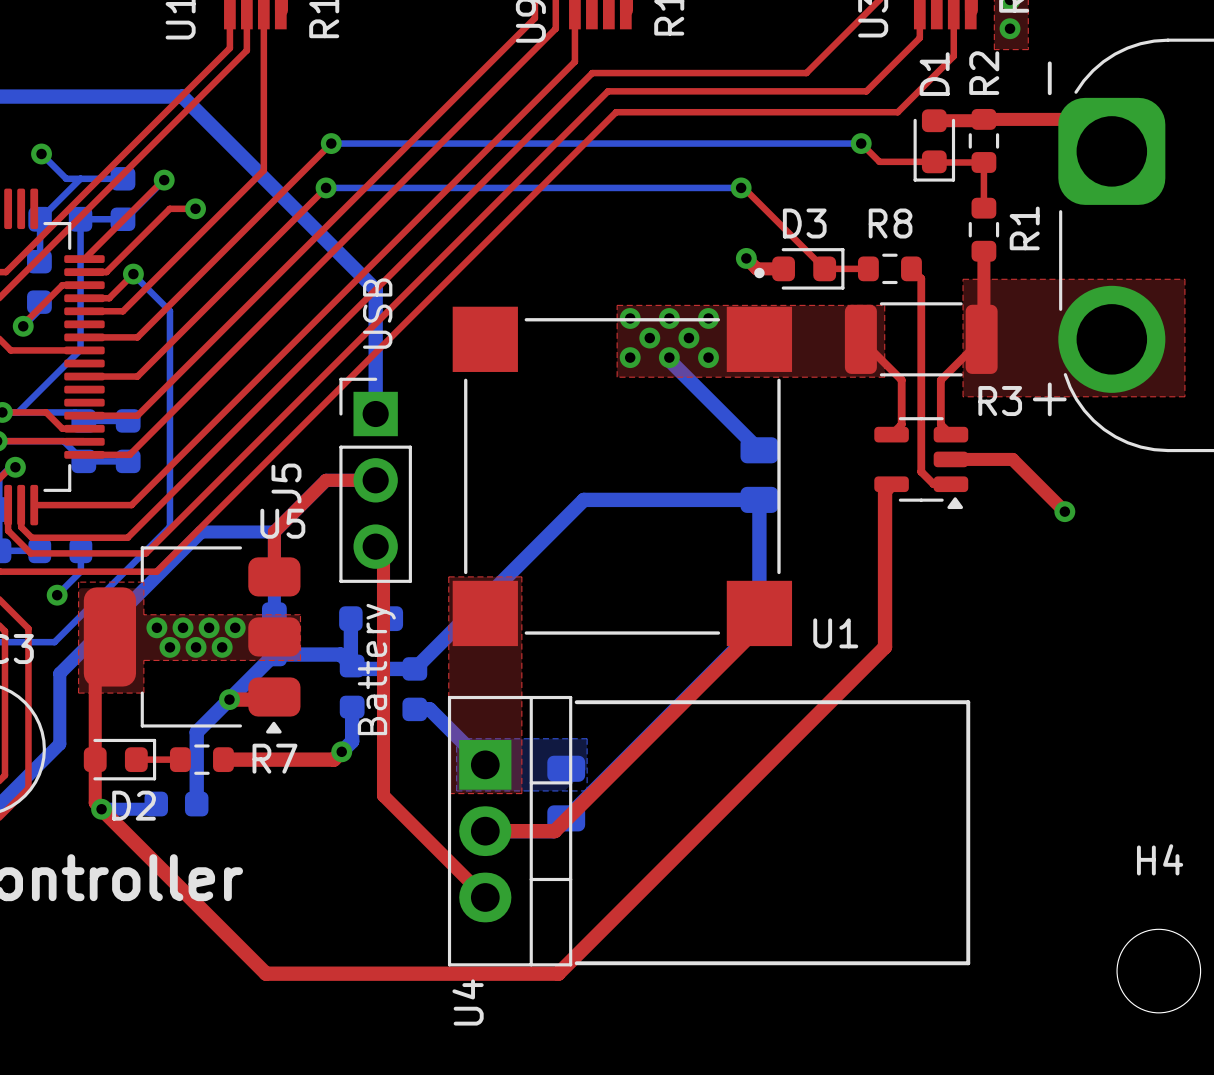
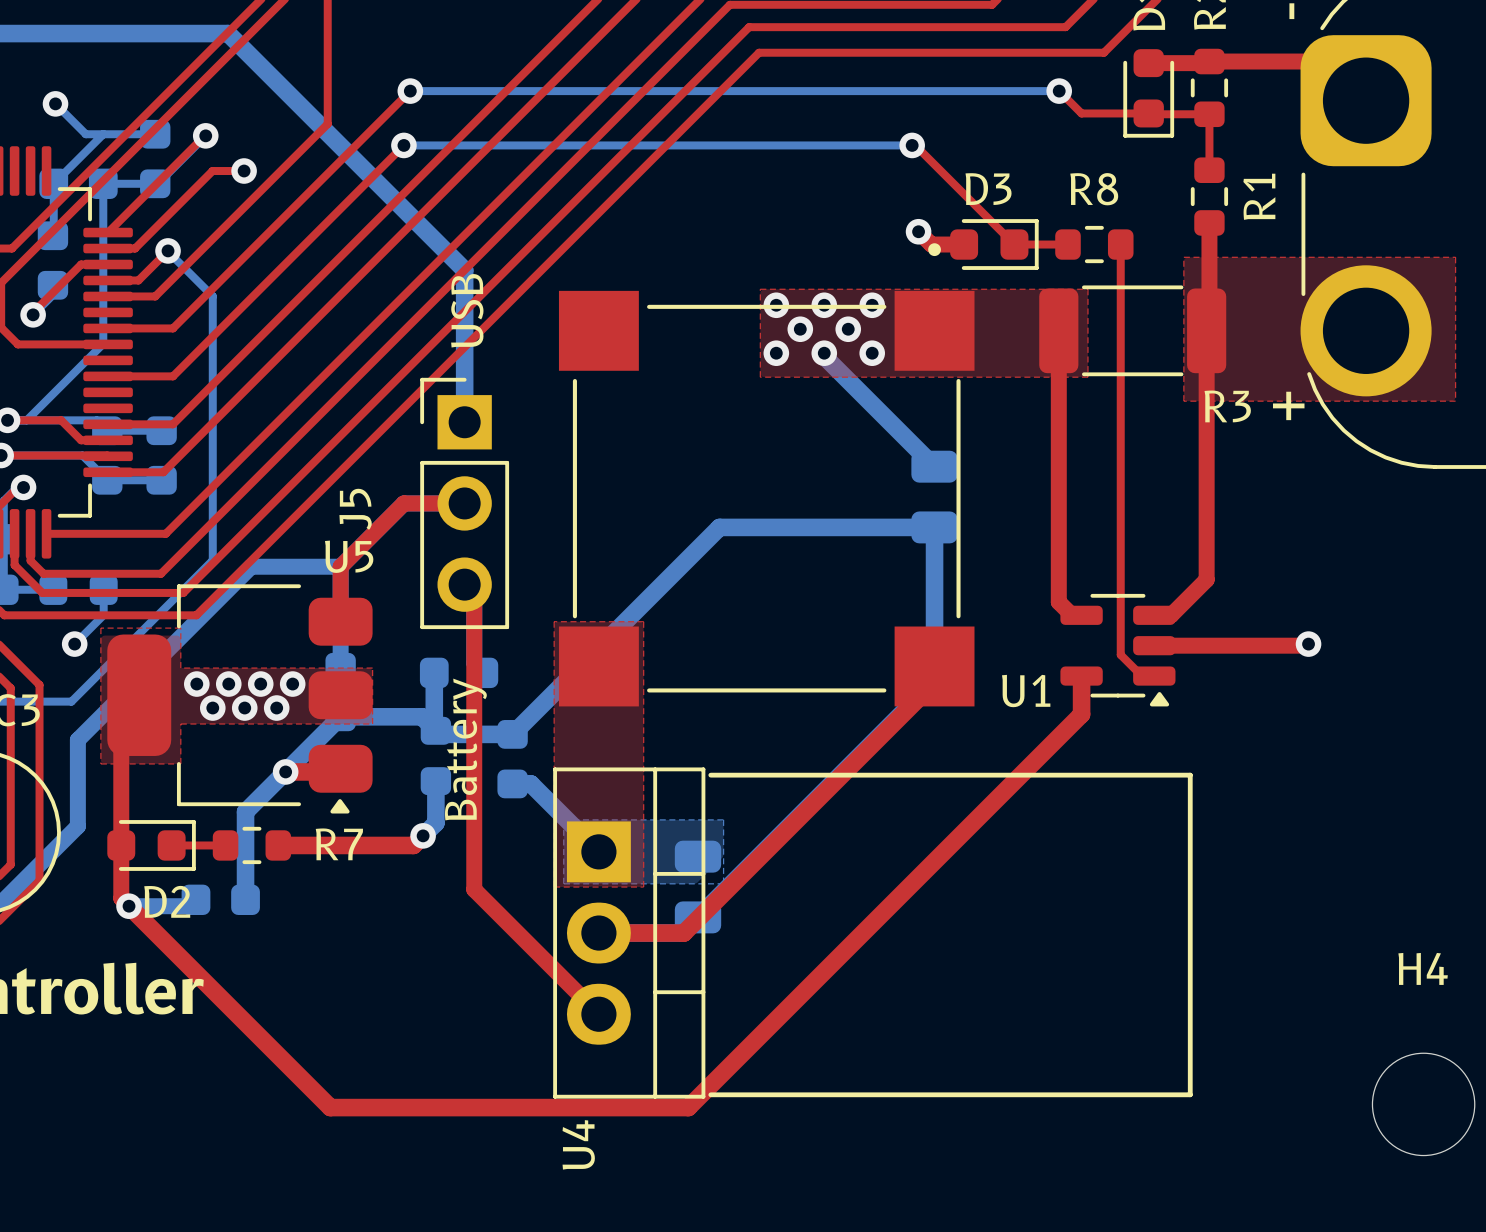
top track: (911, 268) (921, 278) (921, 471) (933, 484) (950, 484) -> (1120, 244) (1120, 654) (1141, 676) (1154, 676)
top track: (860, 339) (901, 380) (901, 424) (891, 434) -> (1058, 330) (1058, 602) (1071, 615) (1081, 615)
top track: (981, 339) (940, 380) (940, 424) (950, 434) -> (1206, 330) (1206, 579) (1171, 615) (1154, 615)
top track: (950, 459) (1012, 459) (1064, 511) -> none
part position: (921, 463) -> (1117, 650)
top track: (891, 484) (885, 490) (885, 647) (879, 652) -> (1081, 676) (1081, 714)
via position: (1064, 511) -> (1308, 644)
top track: none -> (1308, 644) (1306, 645) (1154, 645)

